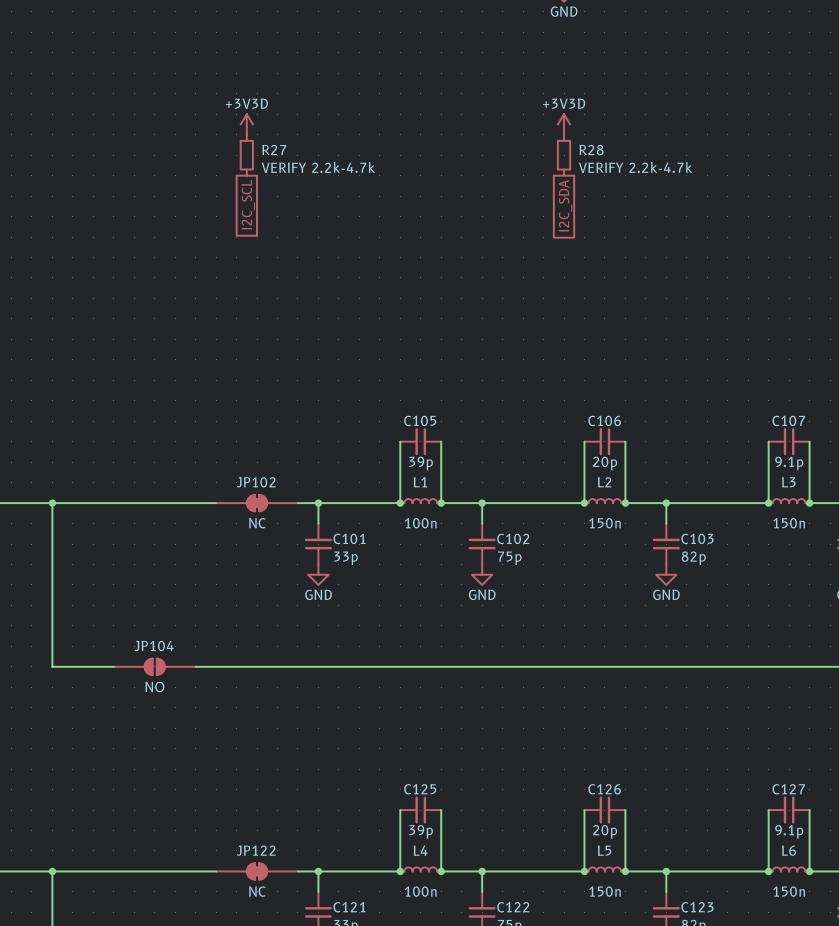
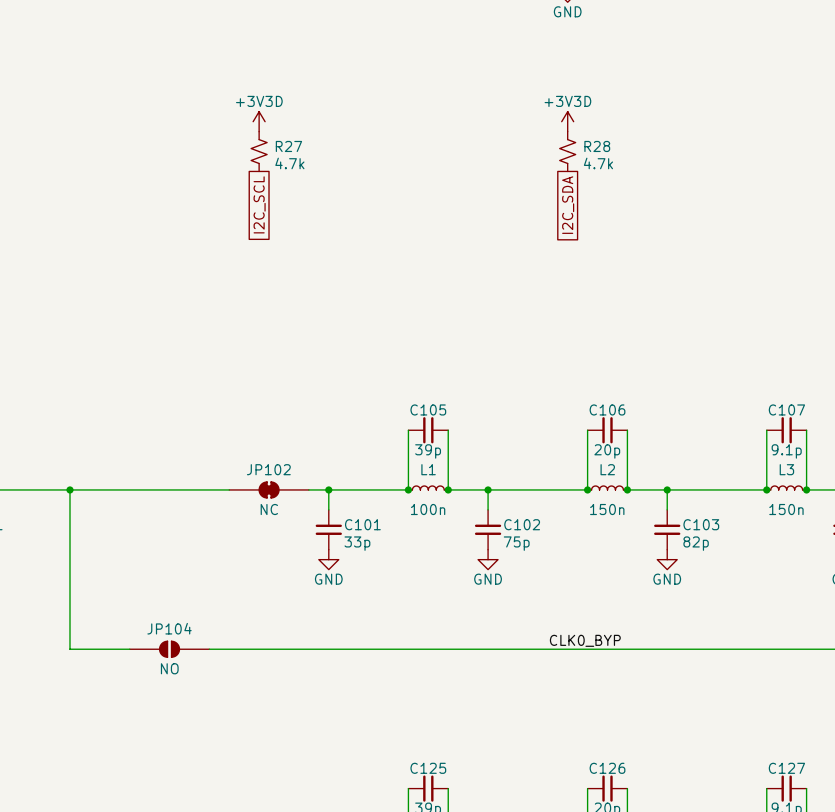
R27 symbol: [239, 134, 254, 176] -> [251, 131, 268, 172]
R28 symbol: [557, 134, 571, 176] -> [559, 131, 576, 172]
R27 value: VERIFY 2.2k-4.7k (318, 167) -> 4.7k (289, 163)
R28 value: VERIFY 2.2k-4.7k (635, 167) -> 4.7k (598, 163)
label: none -> CLK0_BYP (585, 640)

